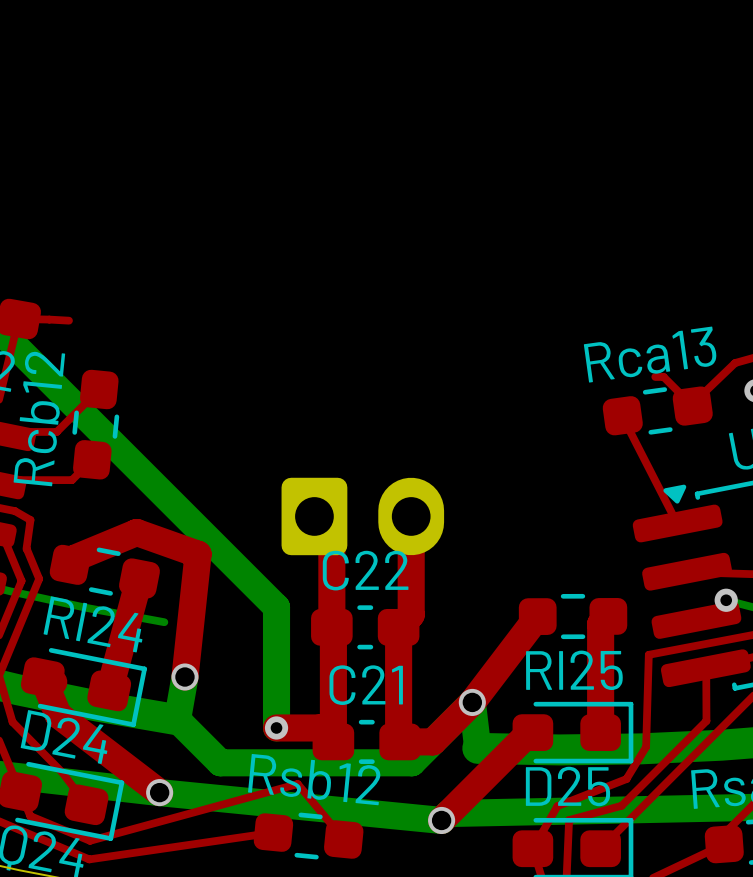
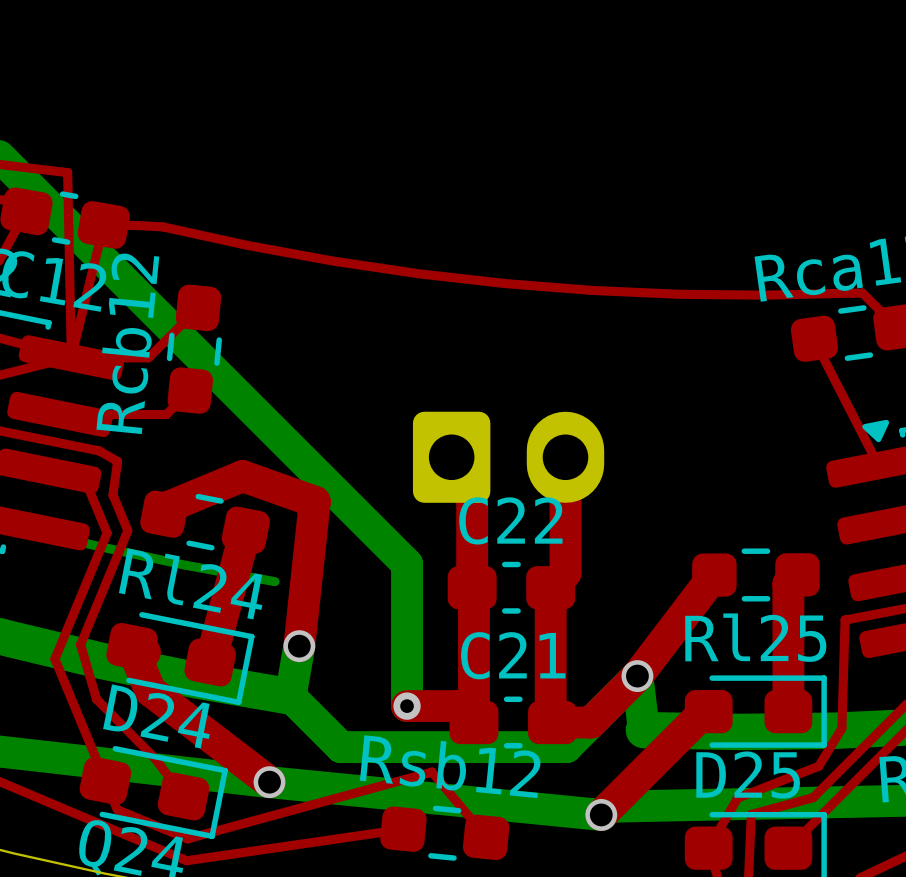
top track: none -> (162, 226) (333, 261) (505, 283) (678, 294) (852, 293)

